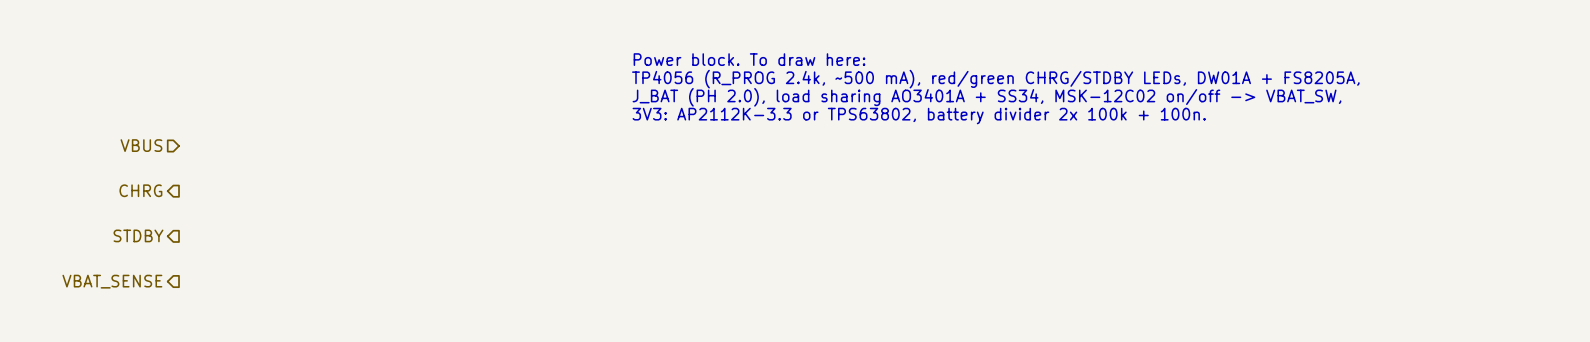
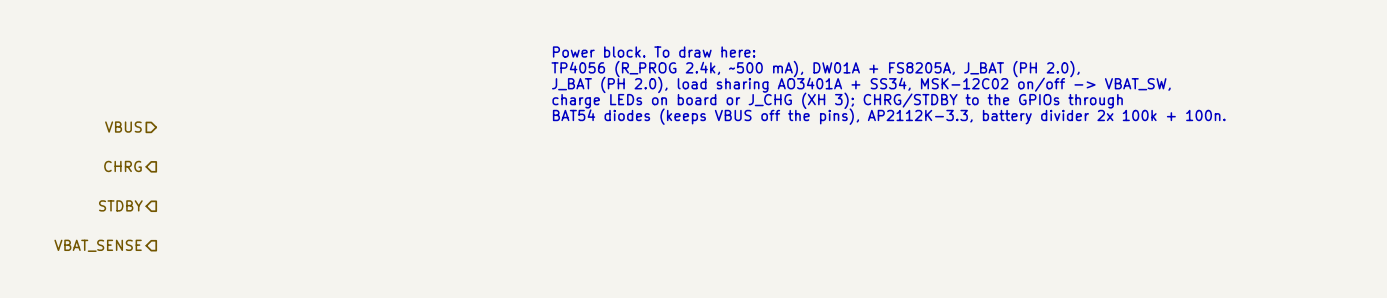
text: TP4056 (R_PROG 2.4k, ~500 mA), red/green CHRG/STDBY LEDs, DW01A + FS8205A, (995, 79) -> TP4056 (R_PROG 2.4k, ~500 mA), DW01A + FS8205A, J_BAT (PH 2.0), (815, 69)
text: 3V3: AP2112K-3.3 or TPS63802, battery divider 2x 100k + 100n. (919, 116) -> charge LEDs on board or J_CHG (XH 3); CHRG/STDBY to the GPIOs through (837, 100)
text: none -> BAT54 diodes (keeps VBUS off the pins), AP2112K-3.3, battery divider 2x 100k + 100n. (889, 116)

